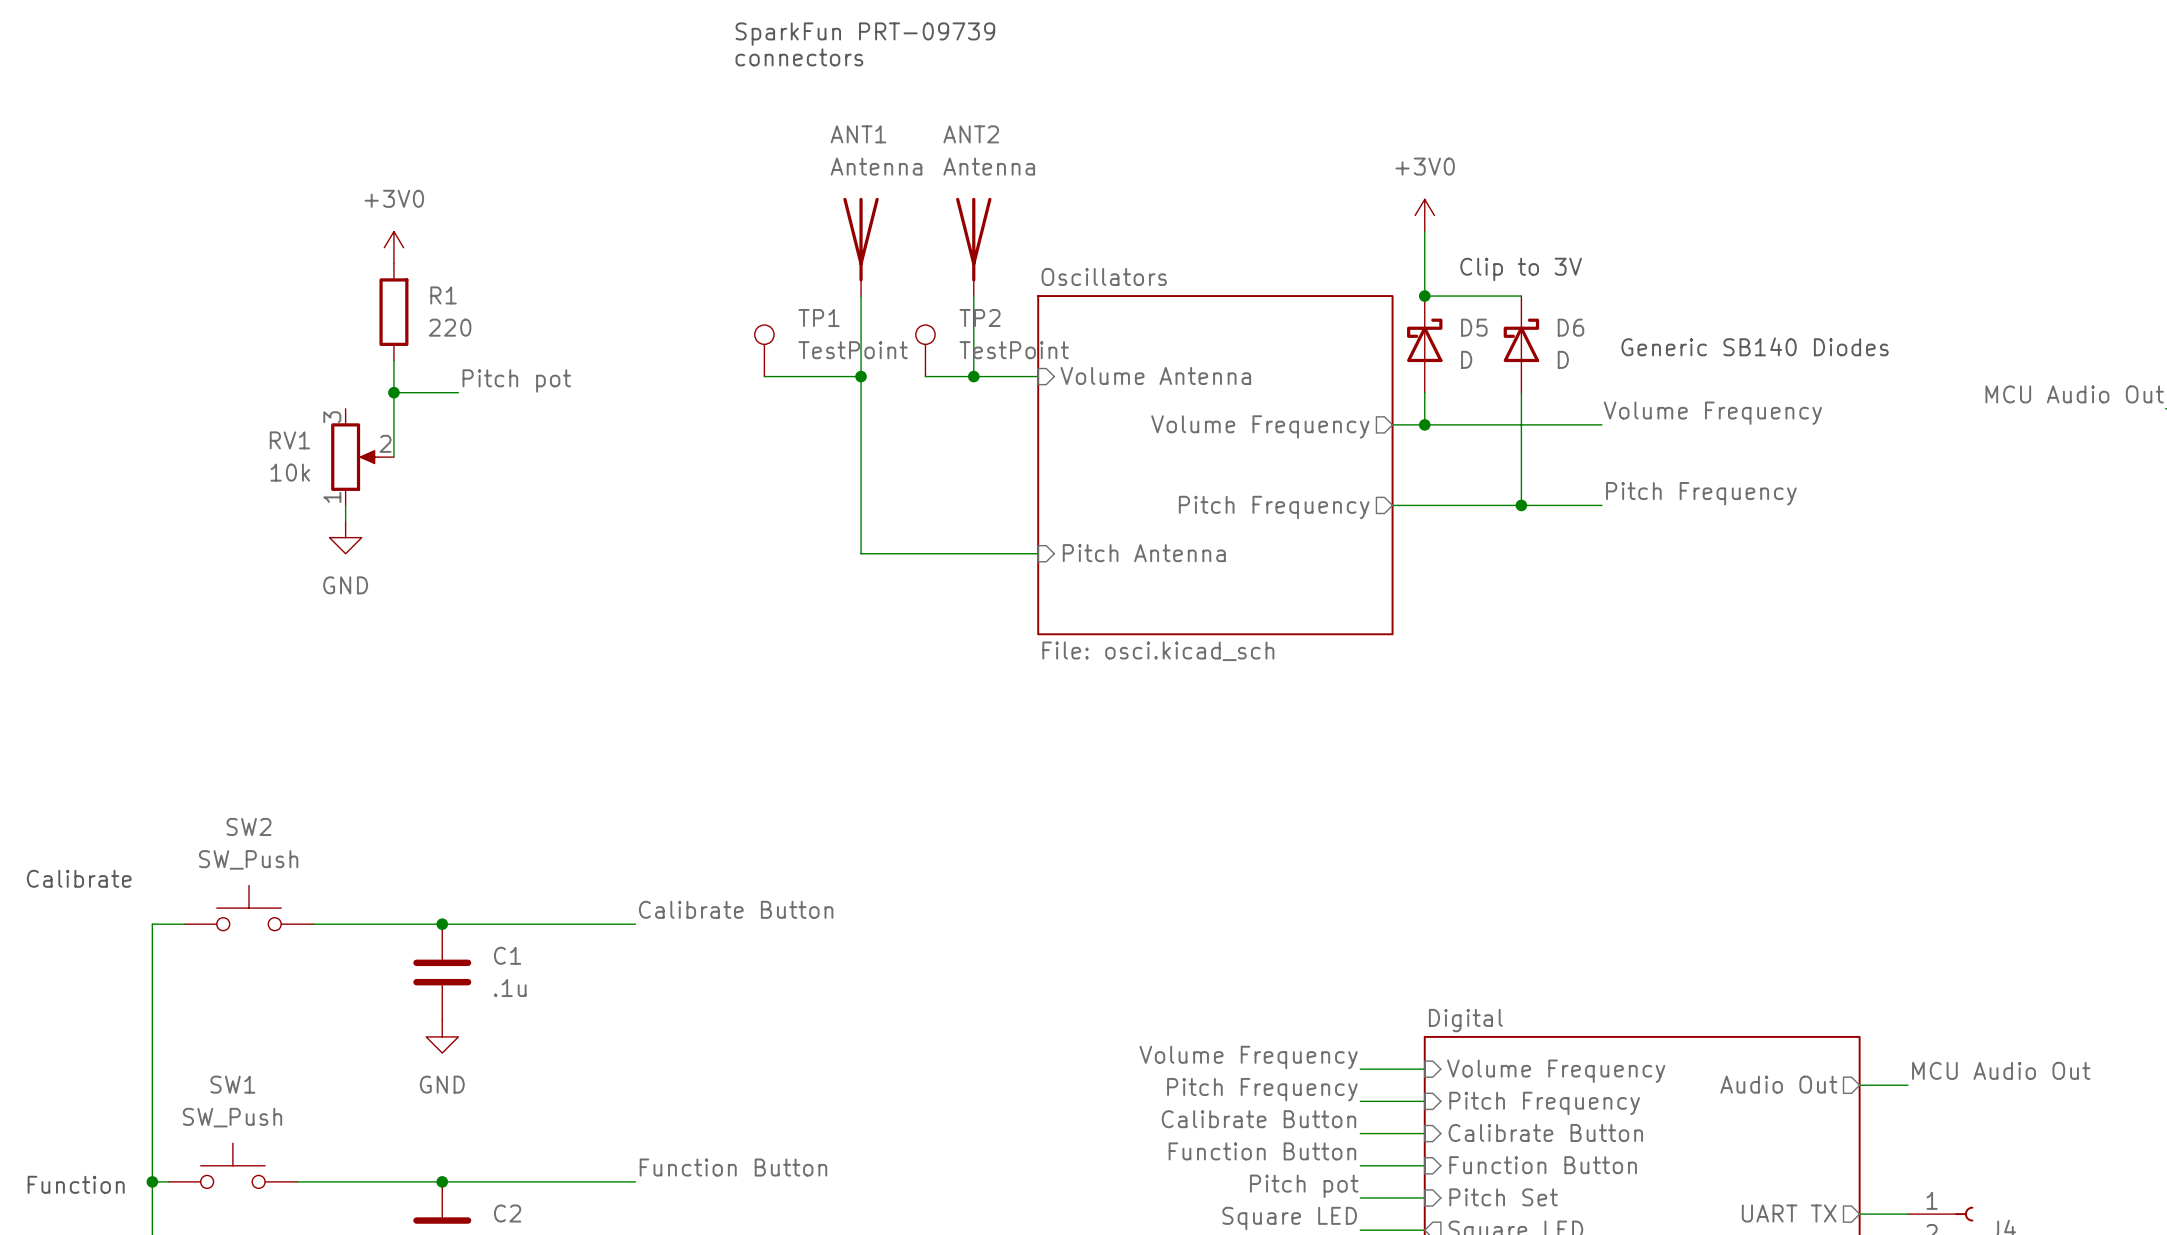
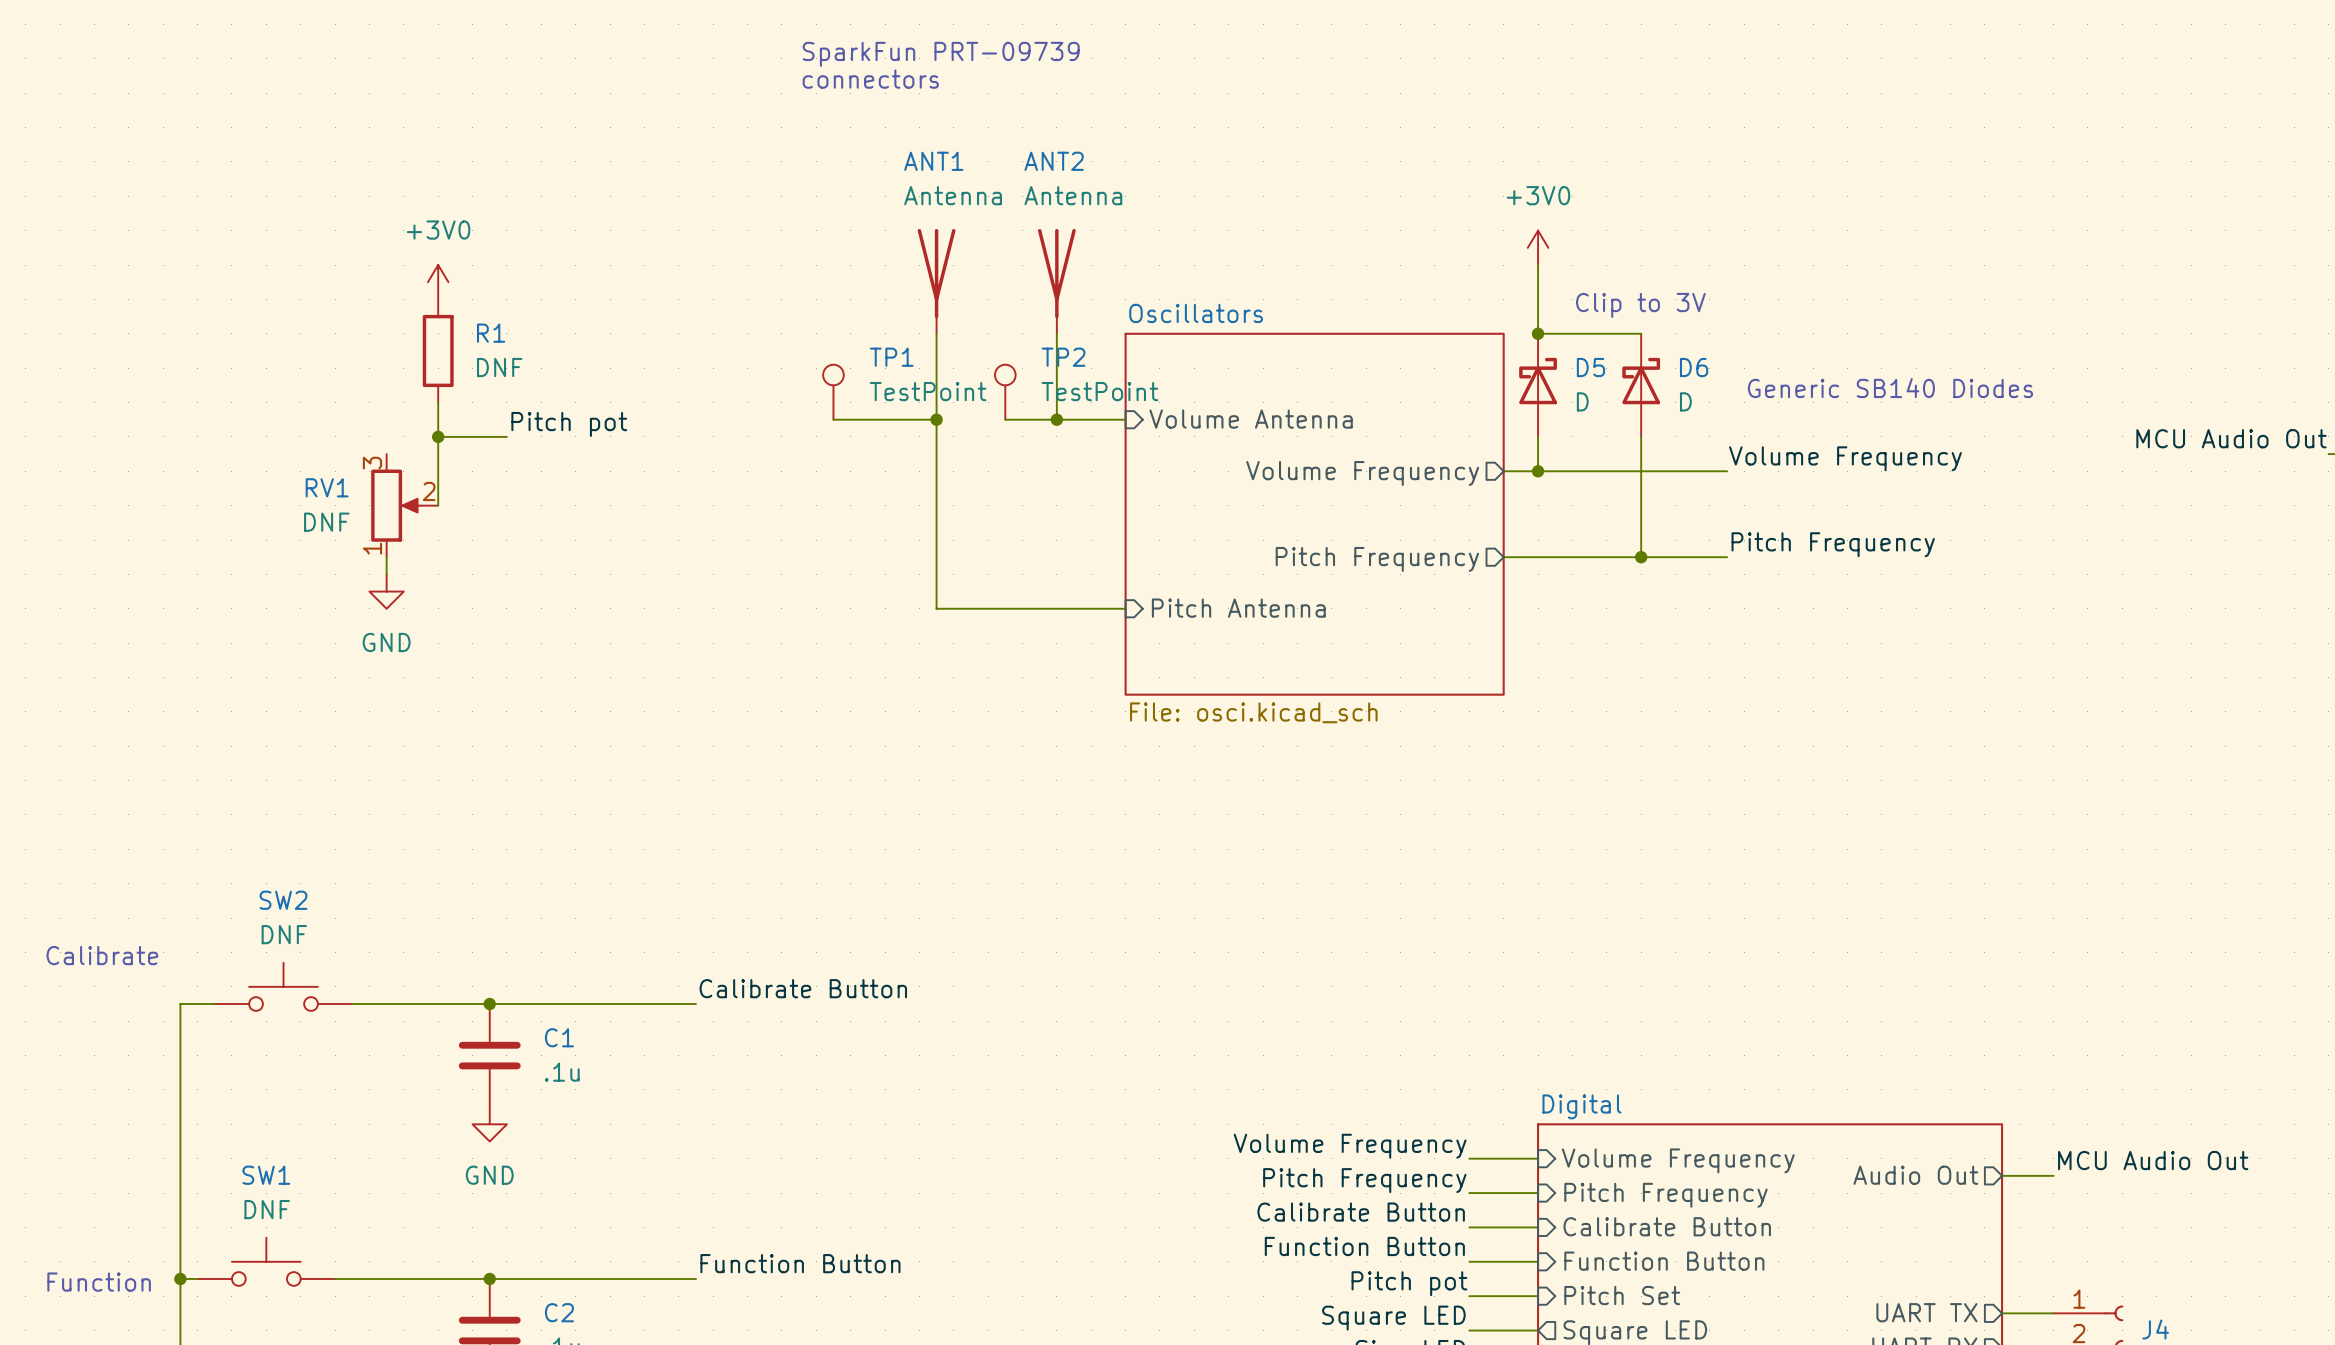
R1 value: 220 (450, 327) -> DNF (499, 367)
RV1 value: 10k (290, 472) -> DNF (326, 522)
SW2 value: SW_Push (248, 859) -> DNF (284, 934)
SW1 value: SW_Push (232, 1117) -> DNF (267, 1209)

